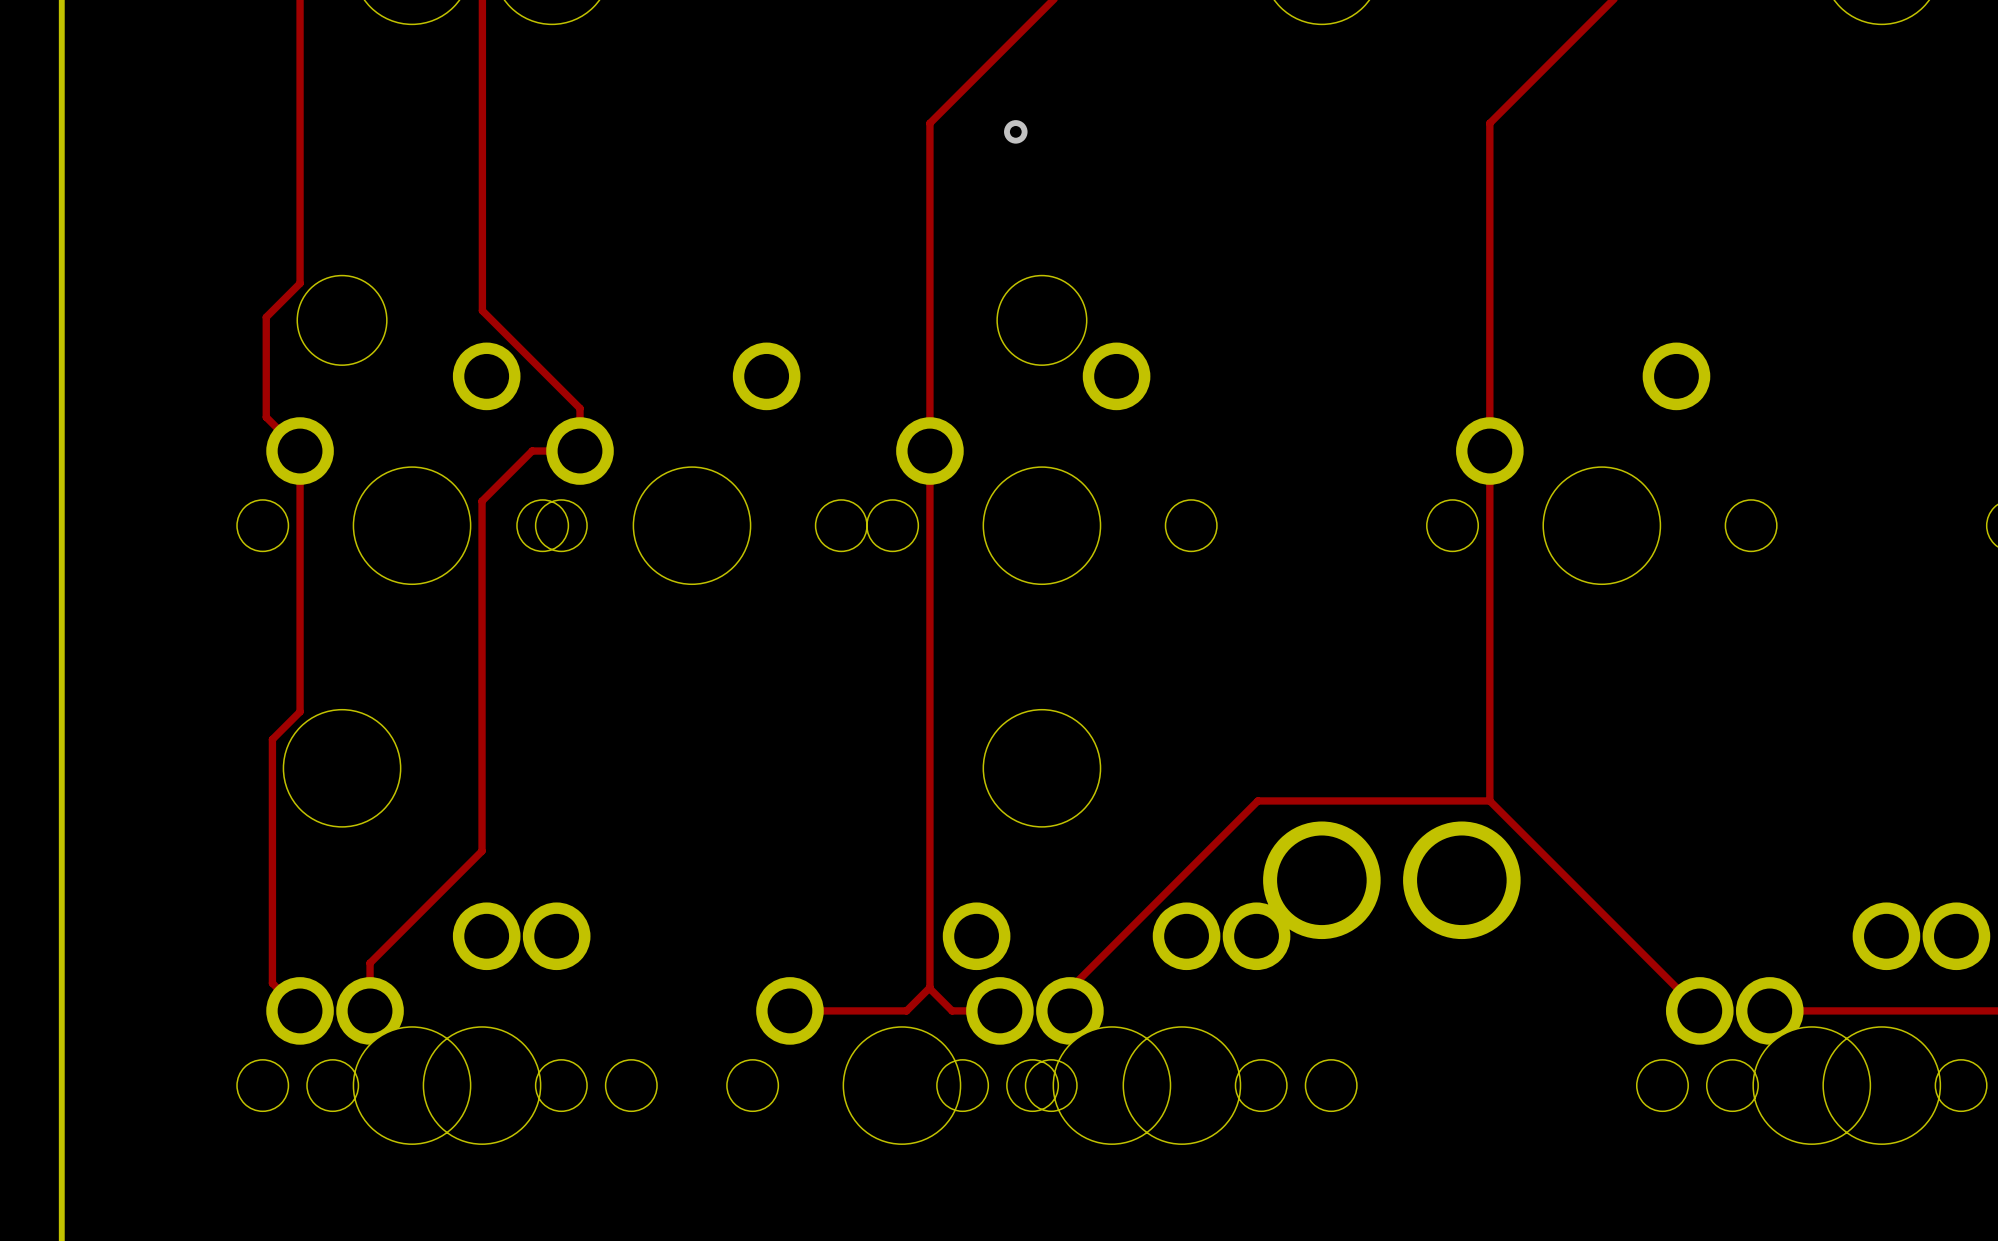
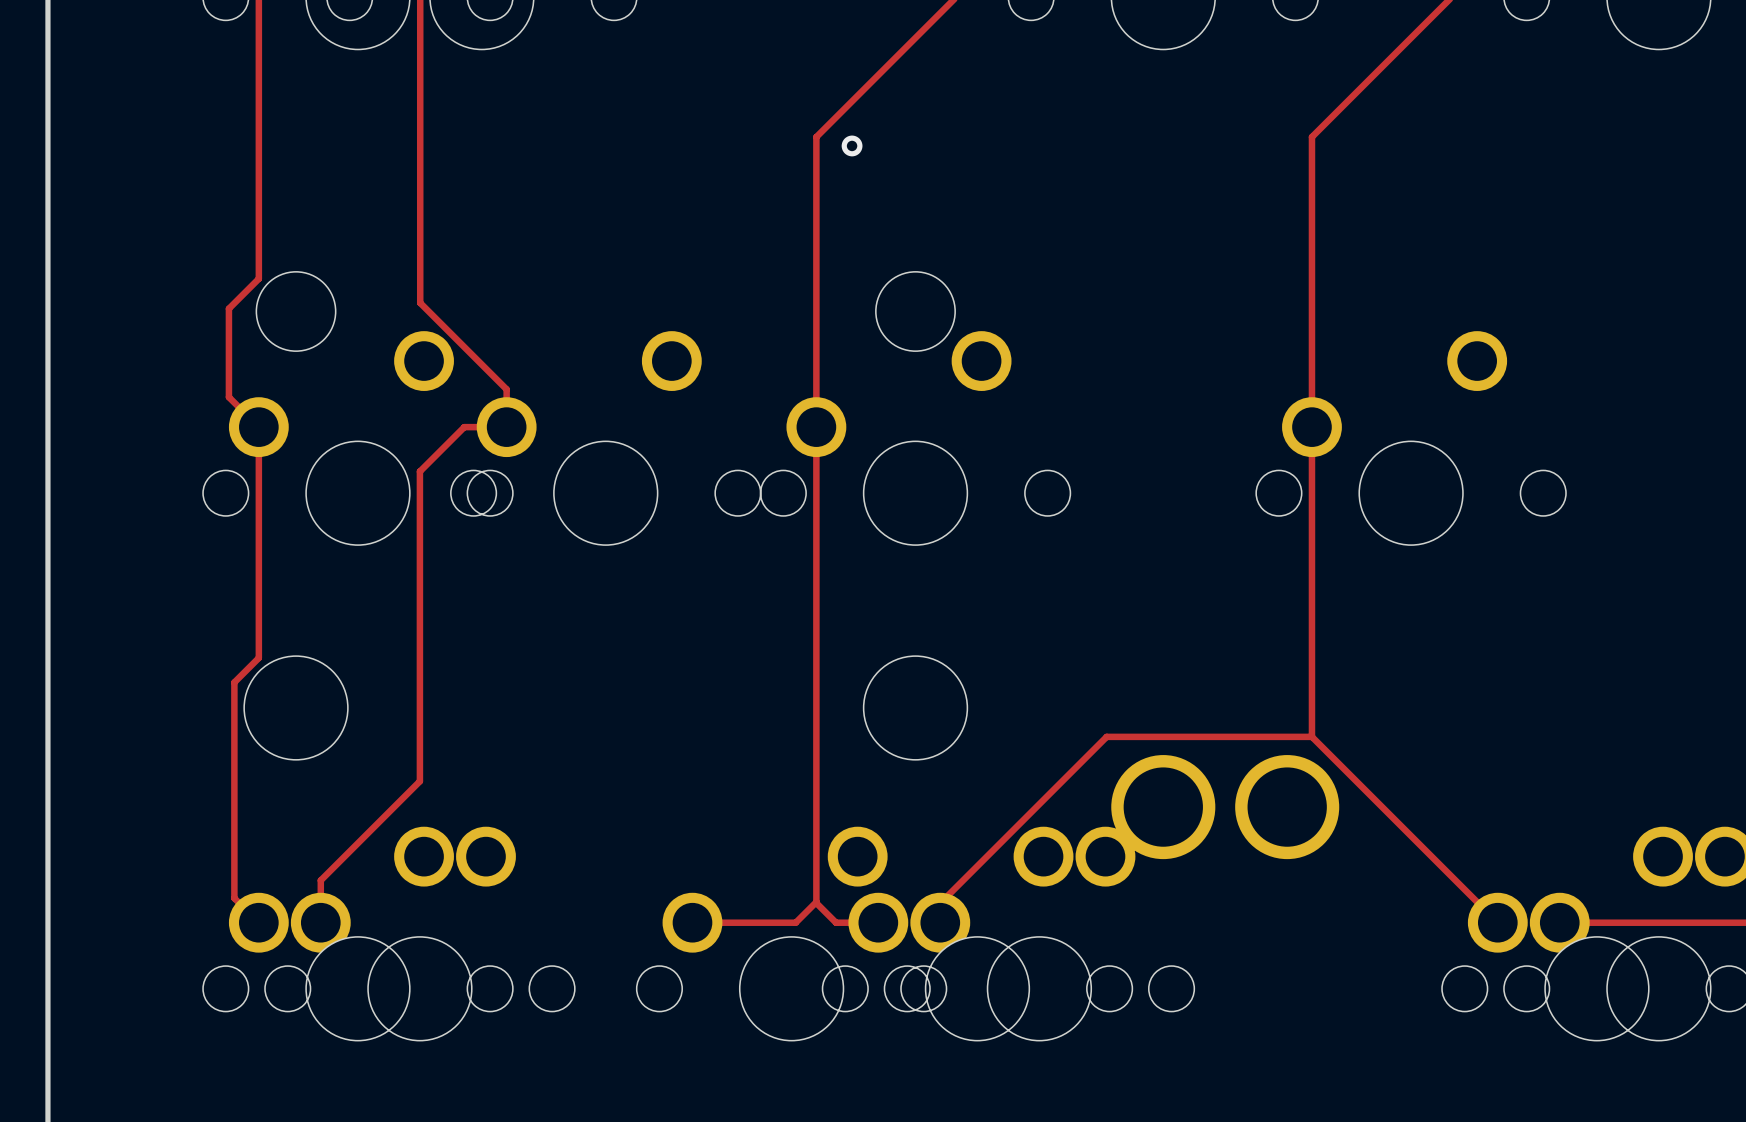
via position: (1015, 131) -> (852, 145)

